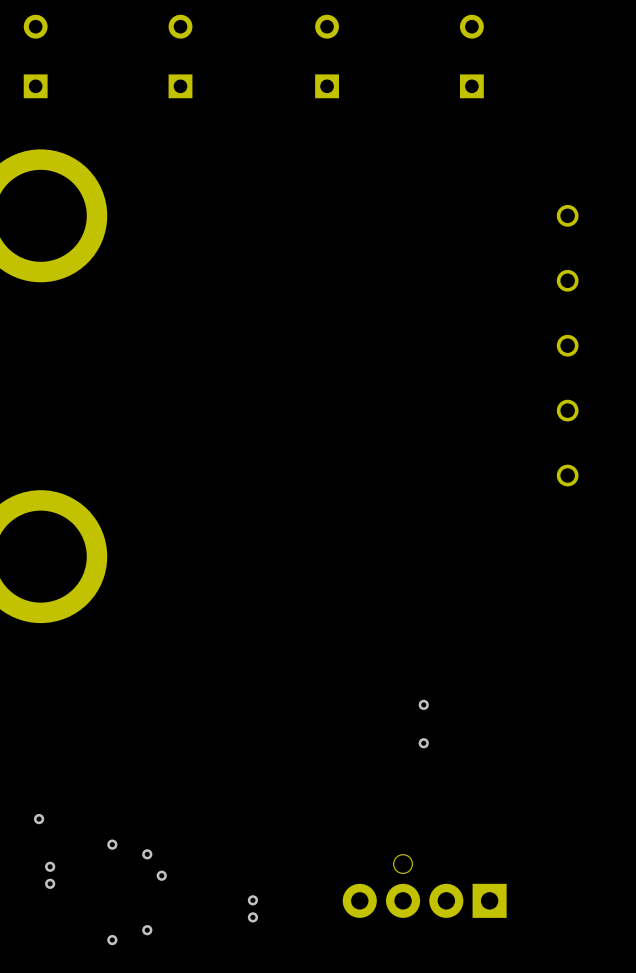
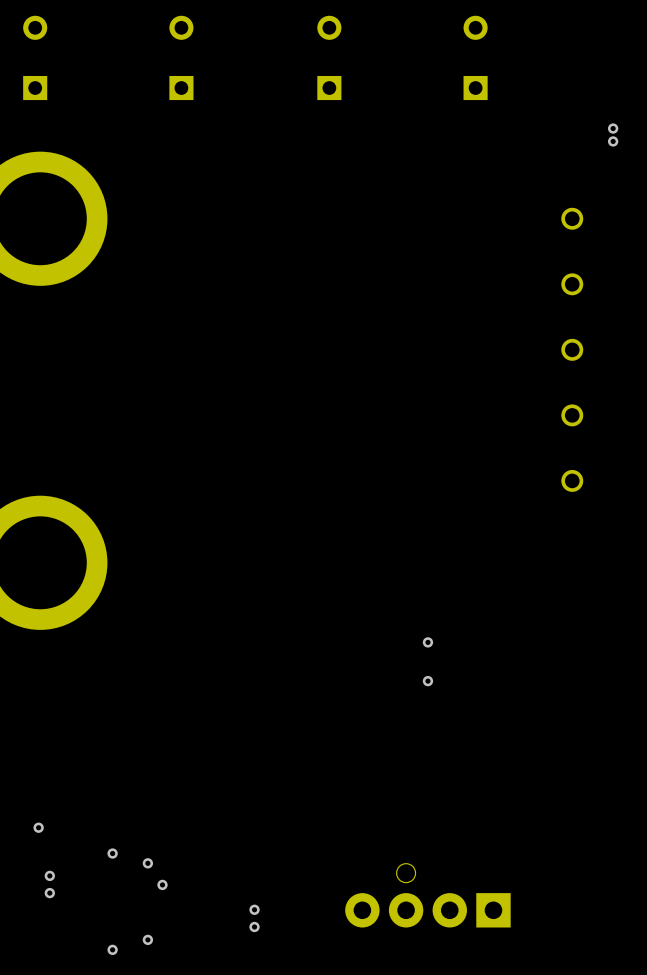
via: none -> (613, 128)
via: none -> (613, 141)
via: none -> (427, 642)
via position: (423, 704) -> (427, 681)
via: (423, 743) -> none

